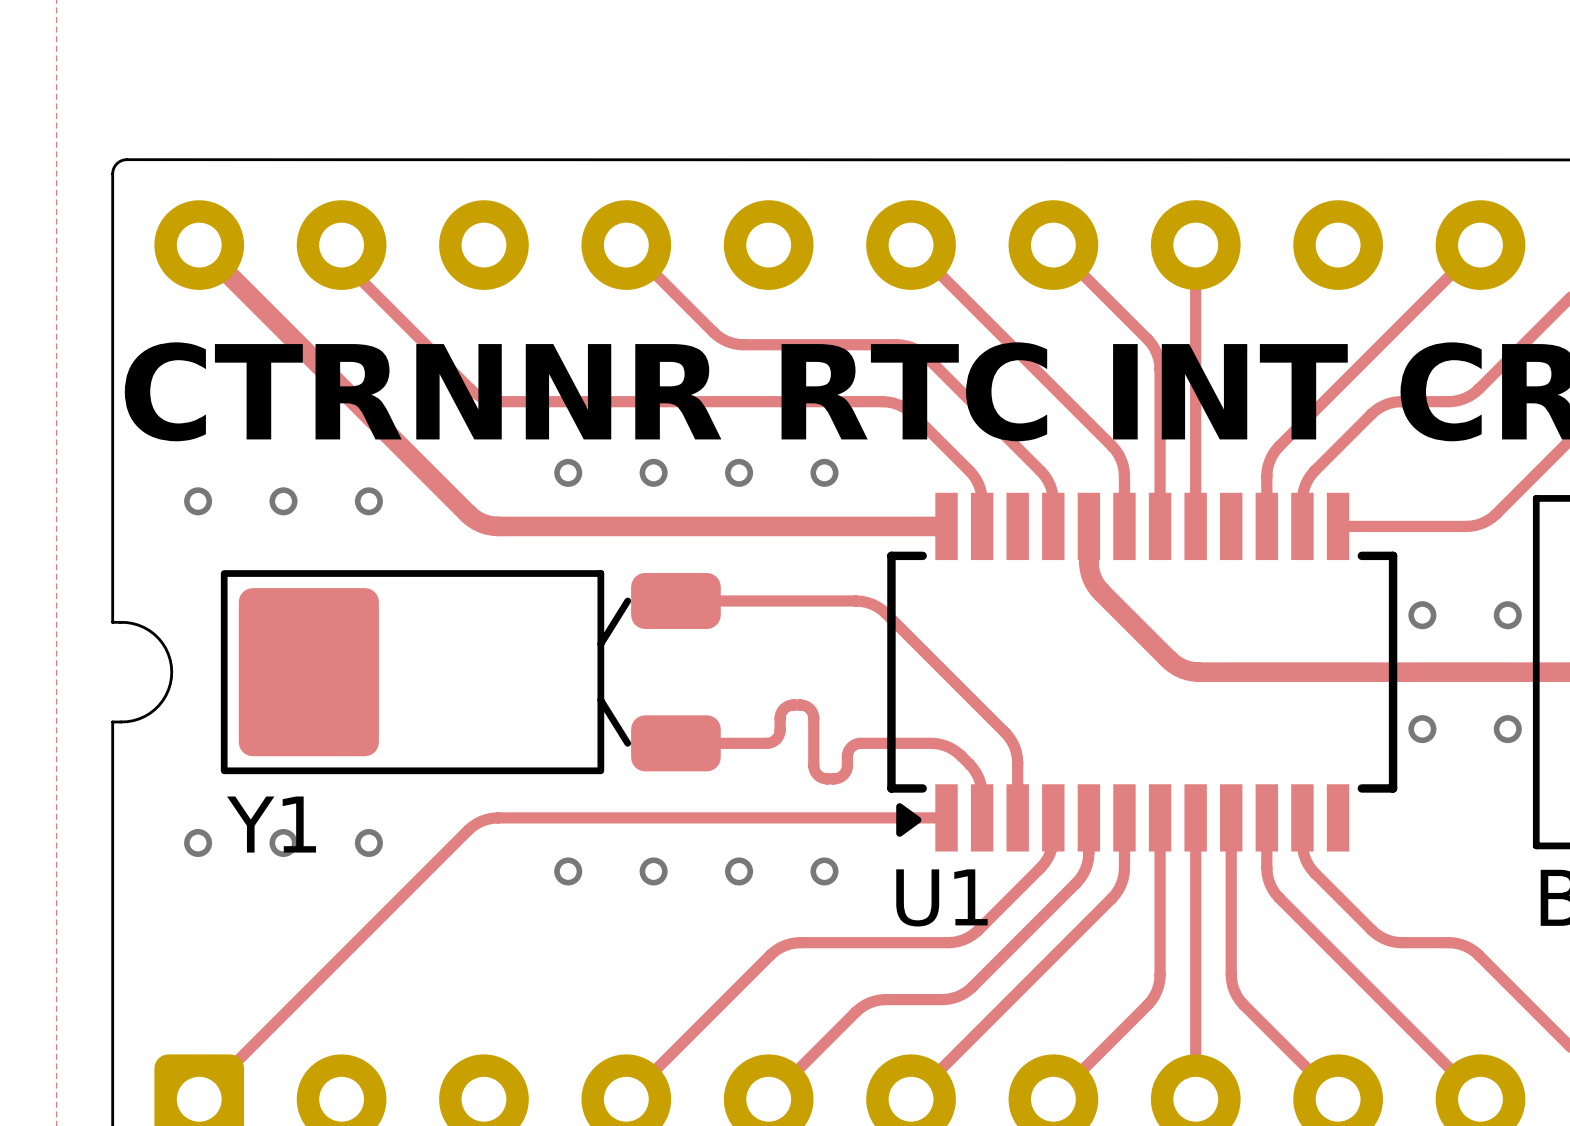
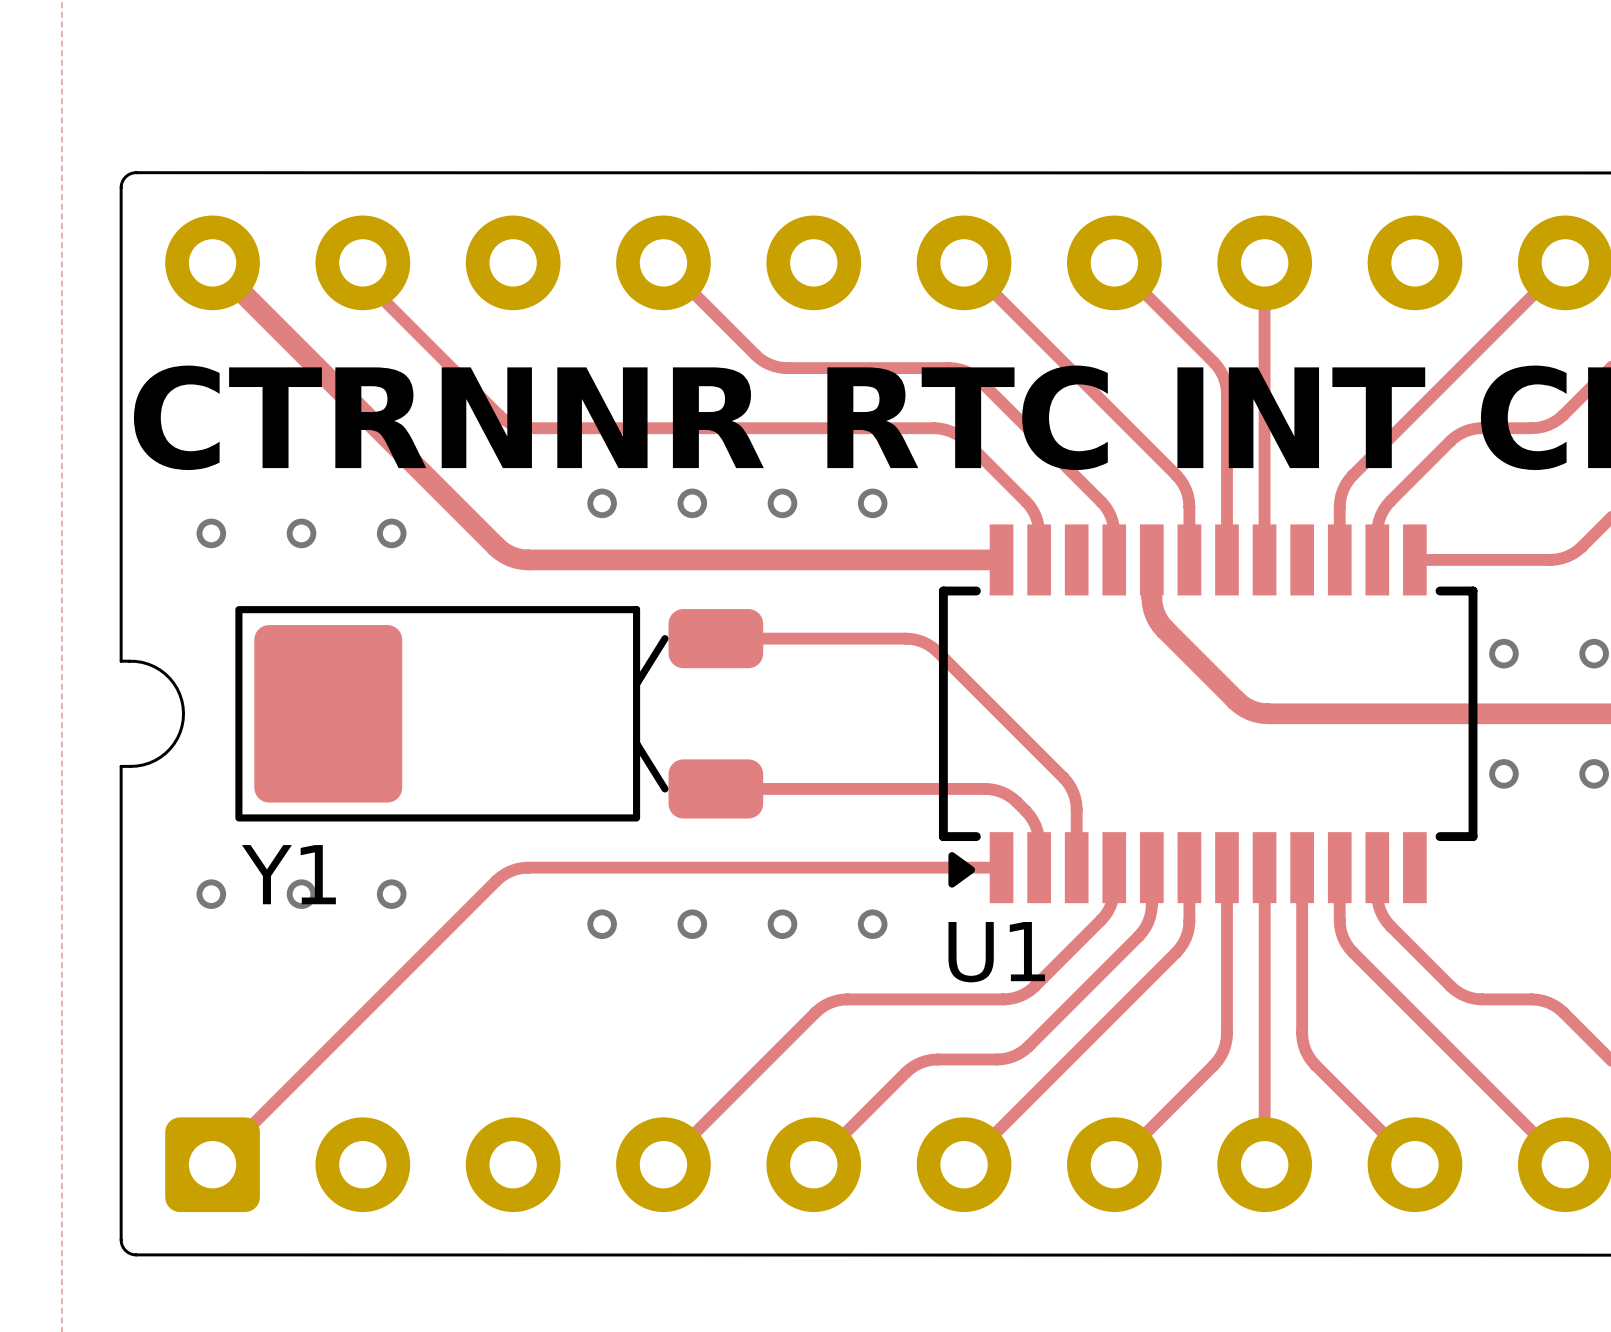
track: (766, 743) (773, 741) (778, 735) (782, 711) (786, 707) (793, 704) (806, 706) (813, 713) (813, 766) (820, 776) (833, 778) (842, 775) (847, 768) (849, 749) (855, 744) (860, 743) -> (811, 788) (911, 788)

